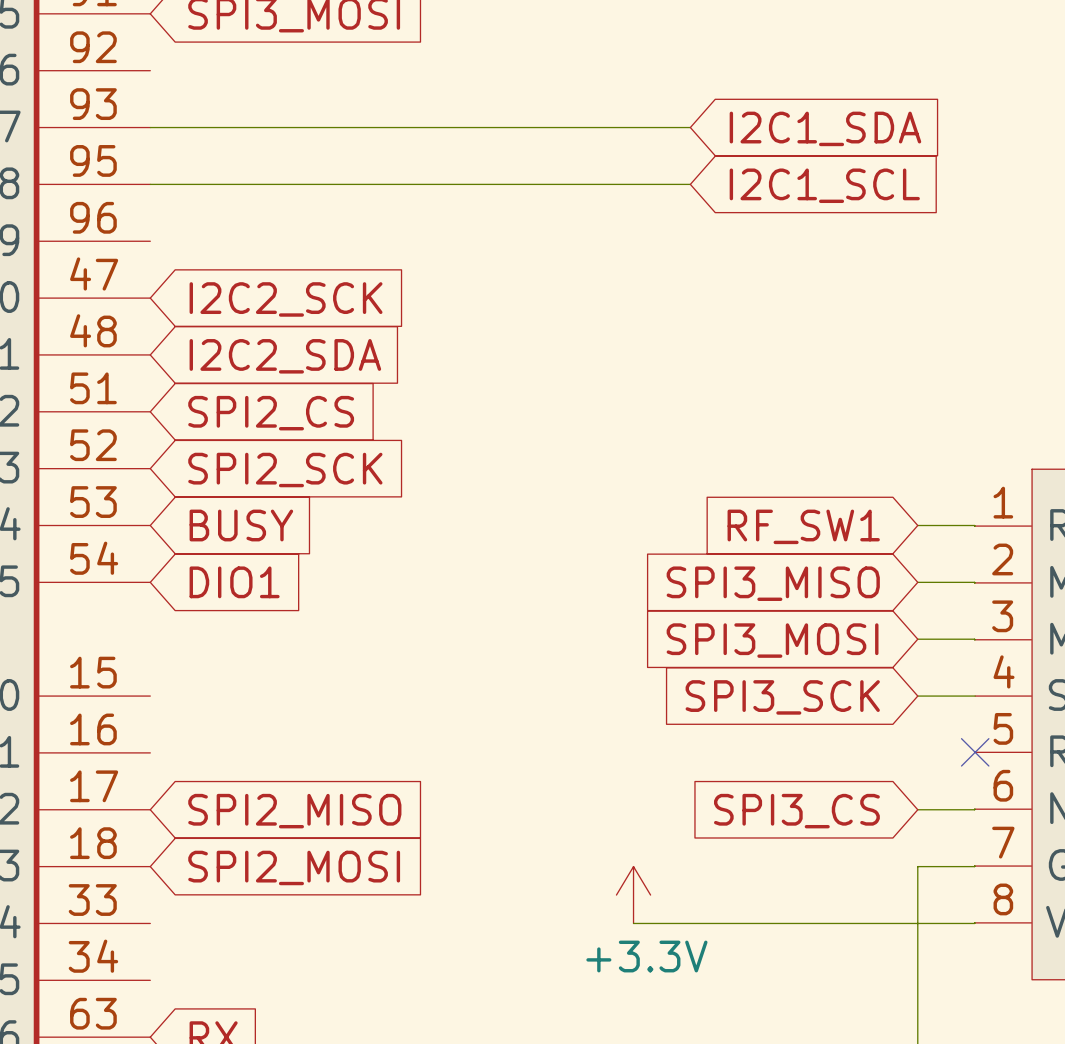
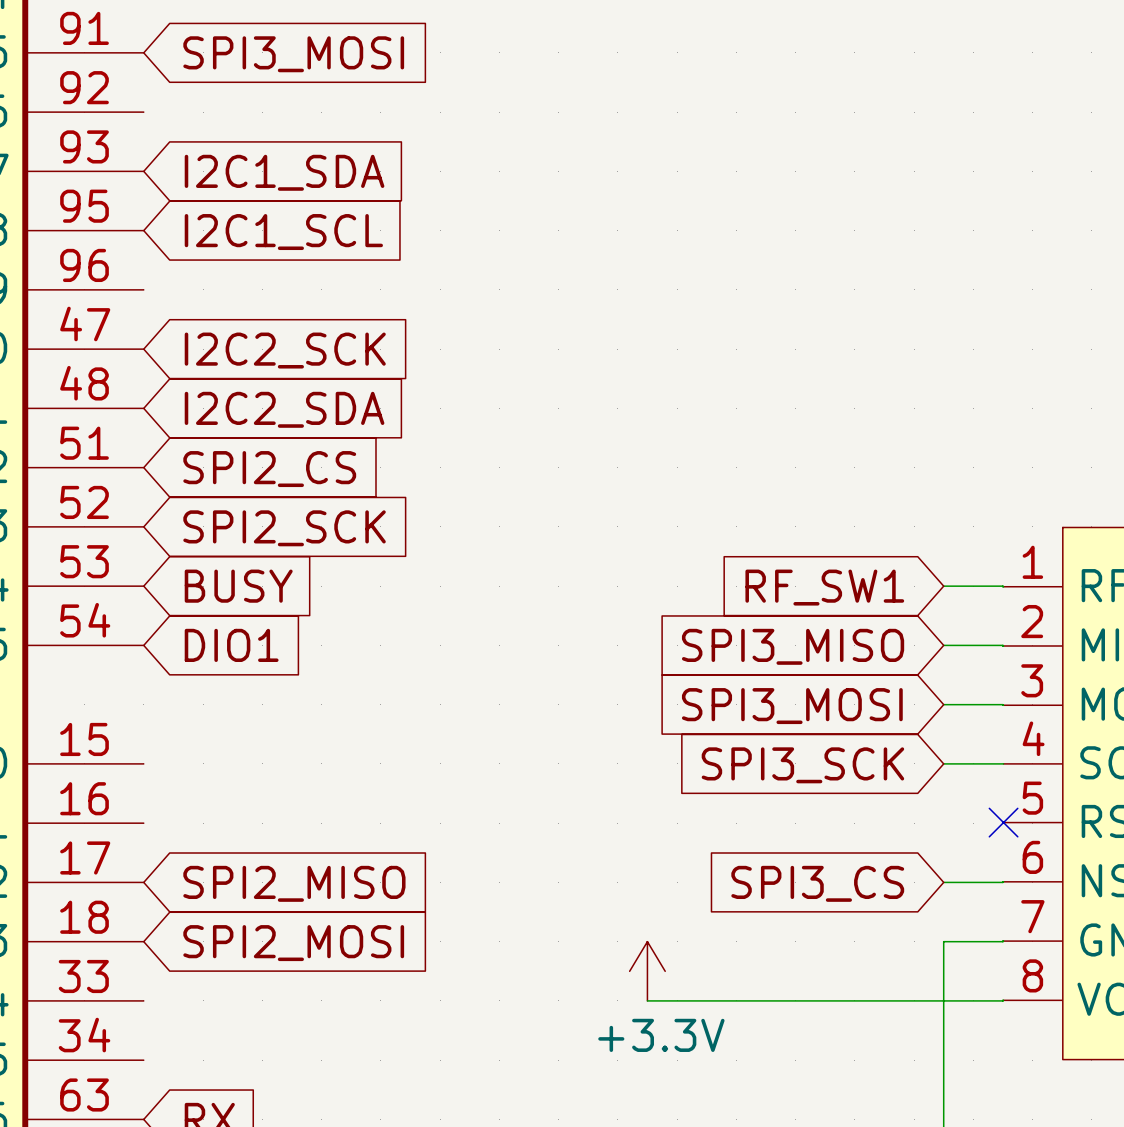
wire: (150, 127) (690, 127) -> none
global label position: I2C1_SDA (825, 128) -> I2C1_SDA (284, 172)
wire: (150, 184) (690, 184) -> none
global label position: I2C1_SCL (824, 185) -> I2C1_SCL (283, 232)

